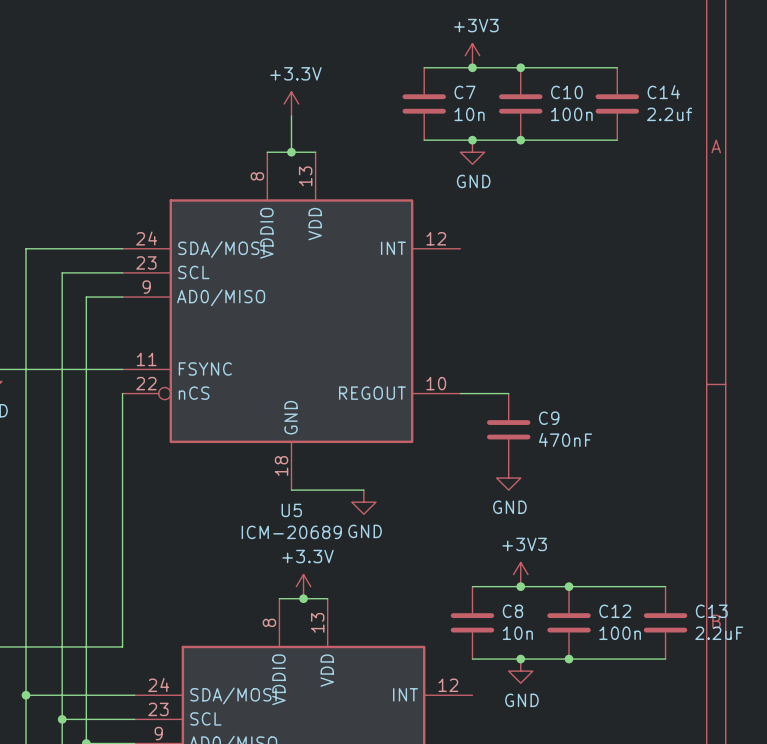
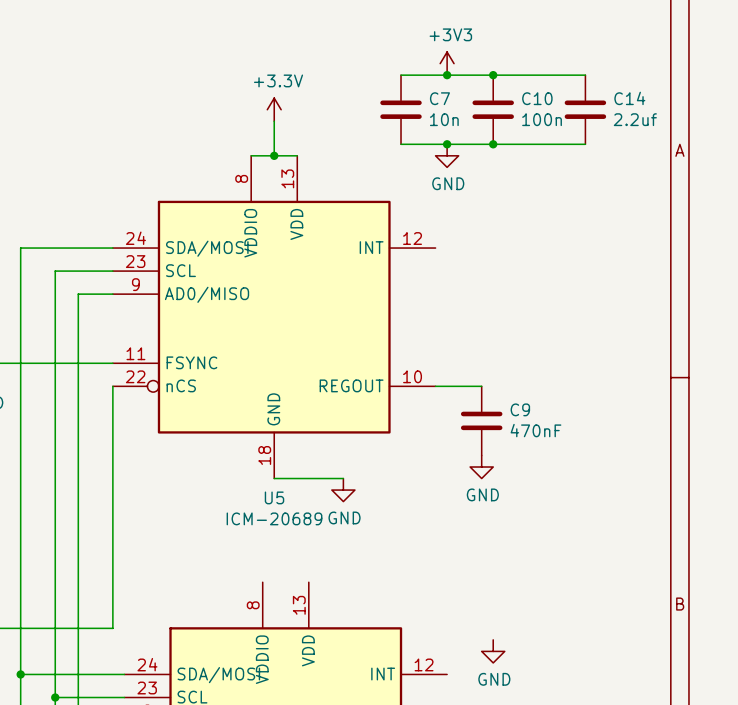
power symbol: +3V3 (520, 574) -> none
power symbol: +3.3V (303, 586) -> none
wire: (472, 586) (665, 586) -> none
junction: (520, 586) -> none
junction: (569, 586) -> none
wire: (279, 598) (327, 598) -> none
junction: (303, 598) -> none
C8: 10n (472, 622) -> none
C12: 100n (569, 622) -> none
C13: 2.2uF (665, 622) -> none
wire: (472, 659) (665, 659) -> none
junction: (520, 659) -> none
junction: (569, 659) -> none

